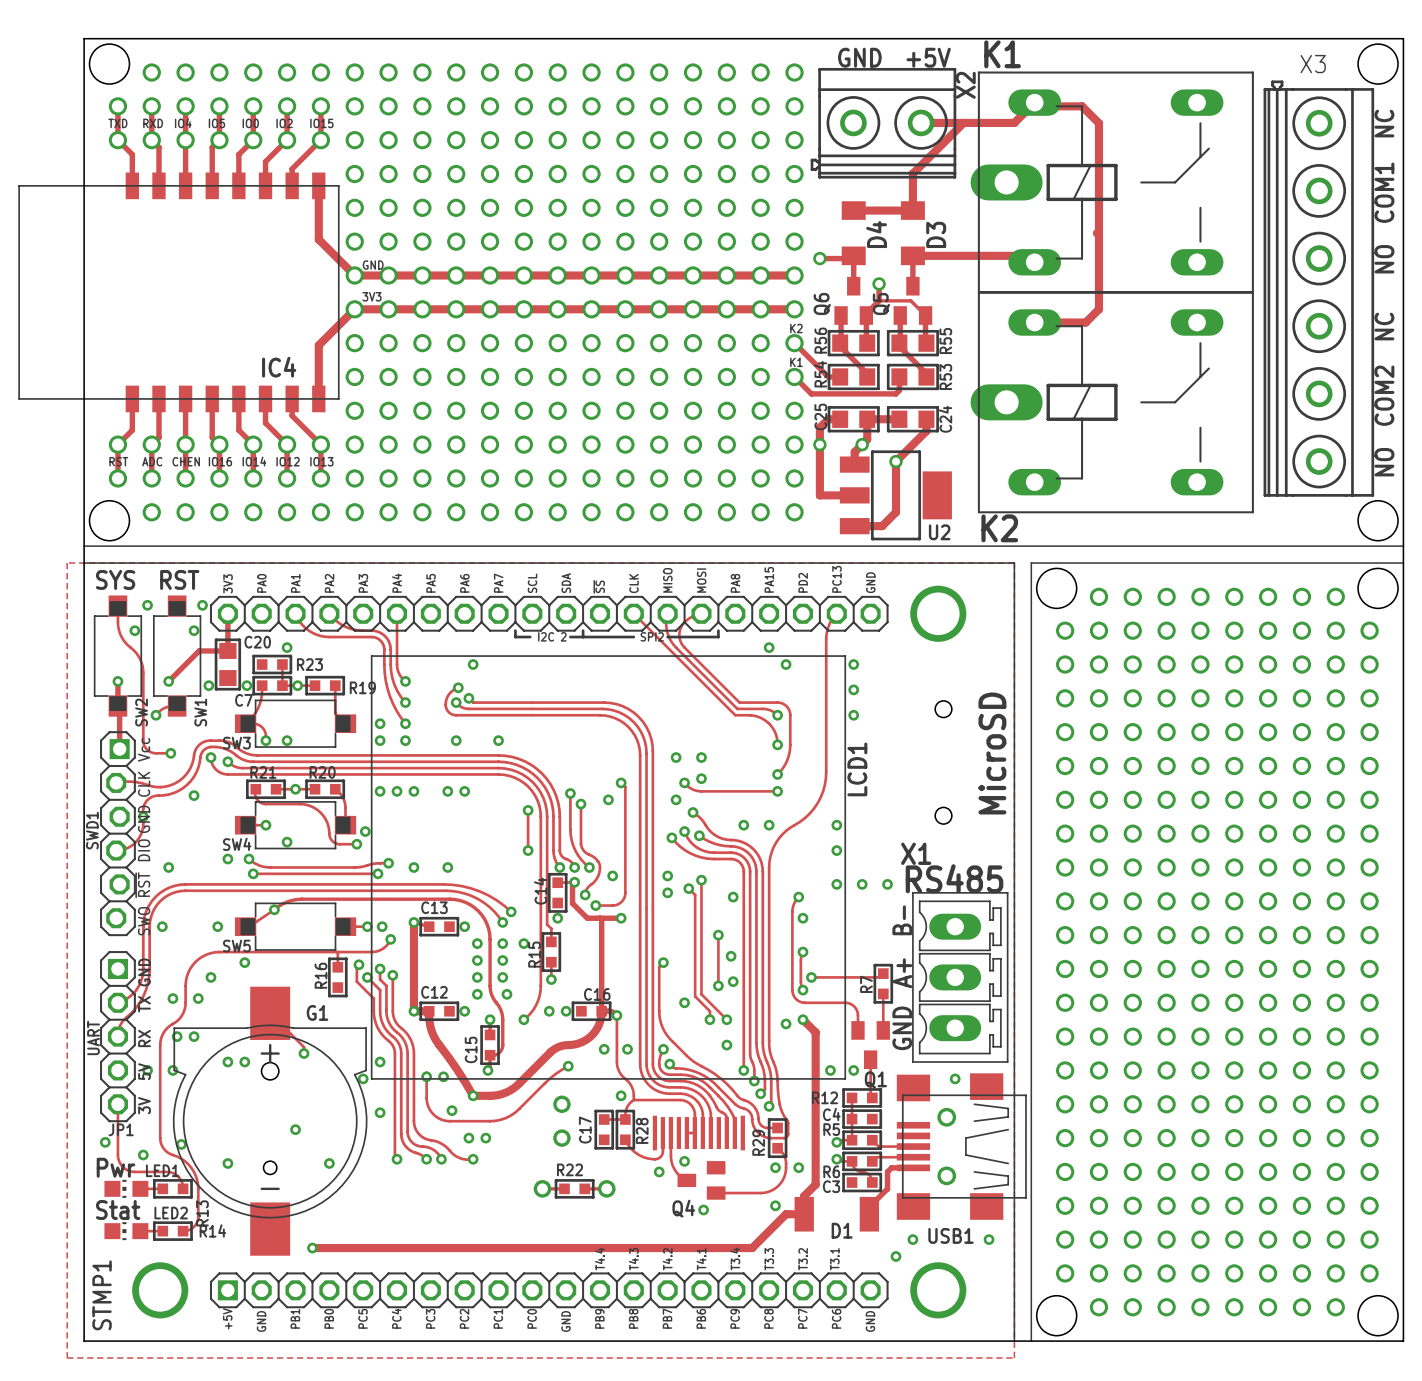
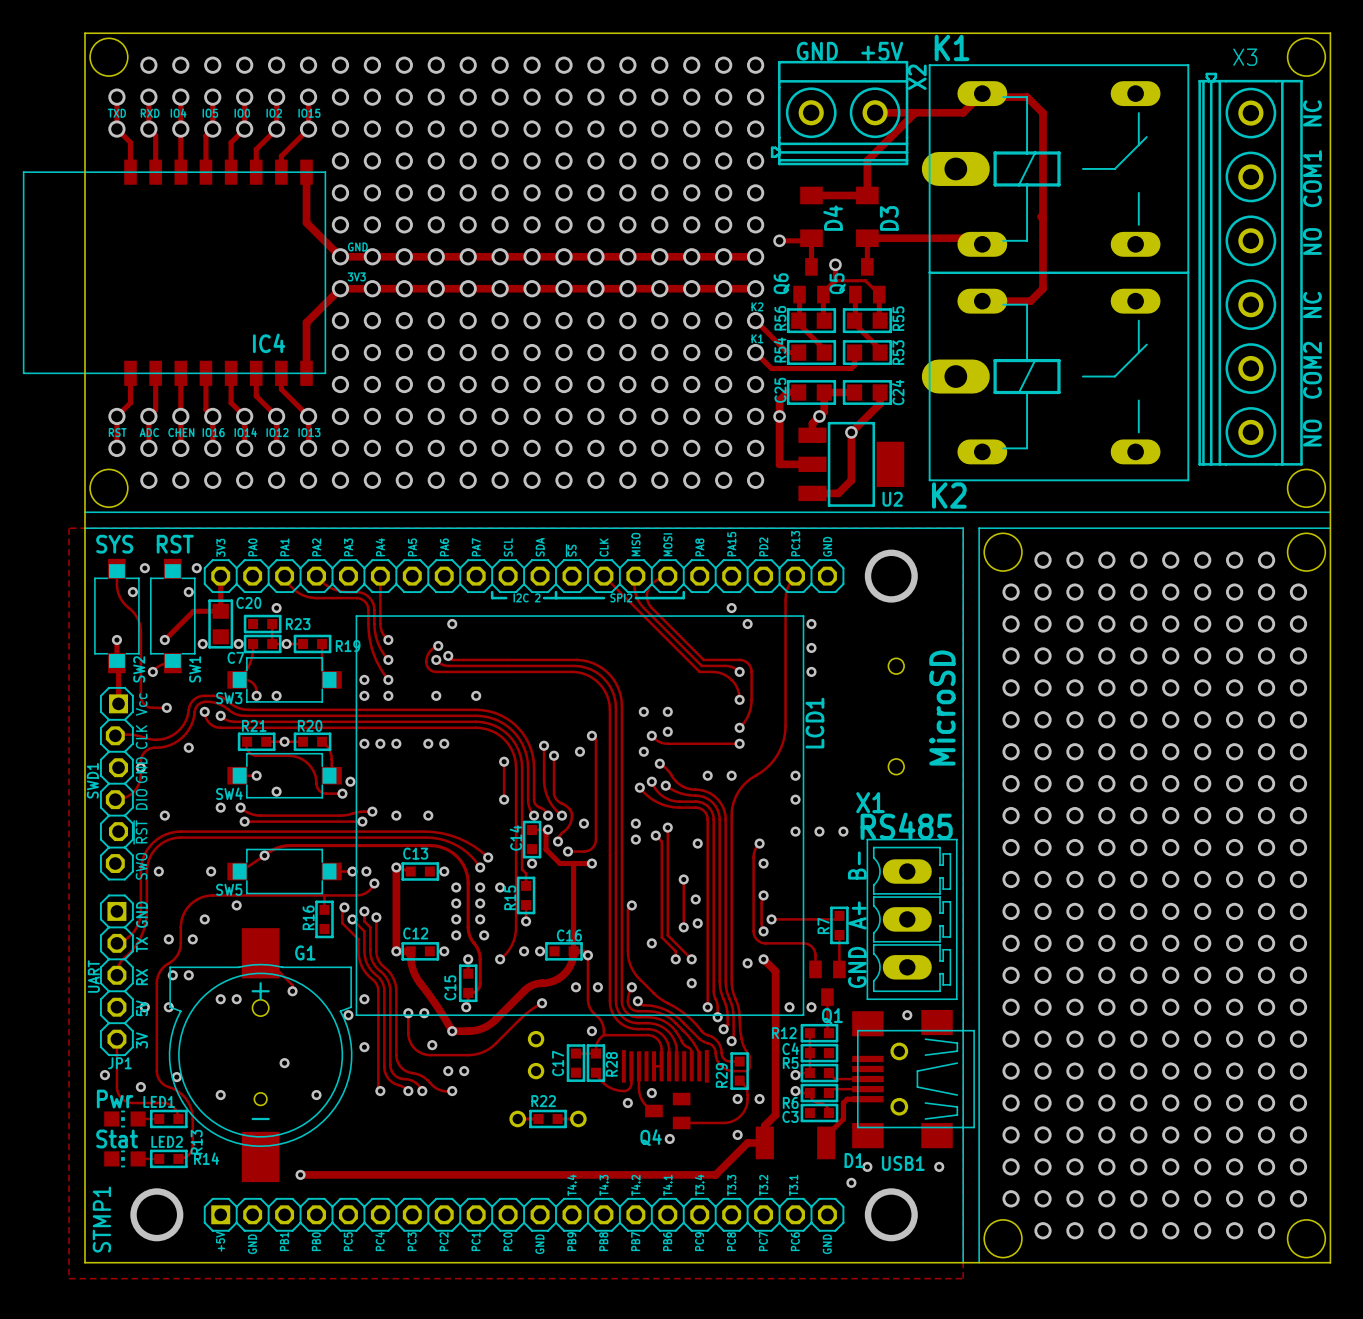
D1 name position: D1 (842, 1230) -> D1 (854, 1160)

